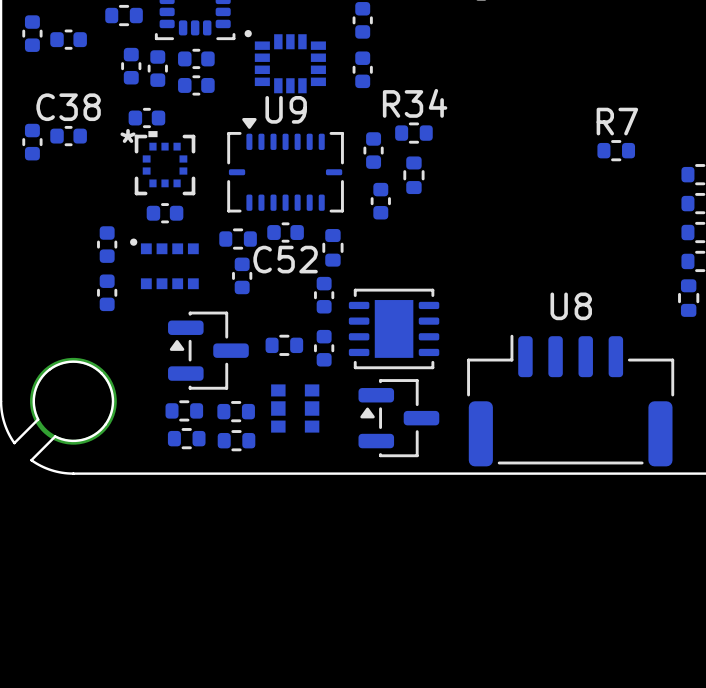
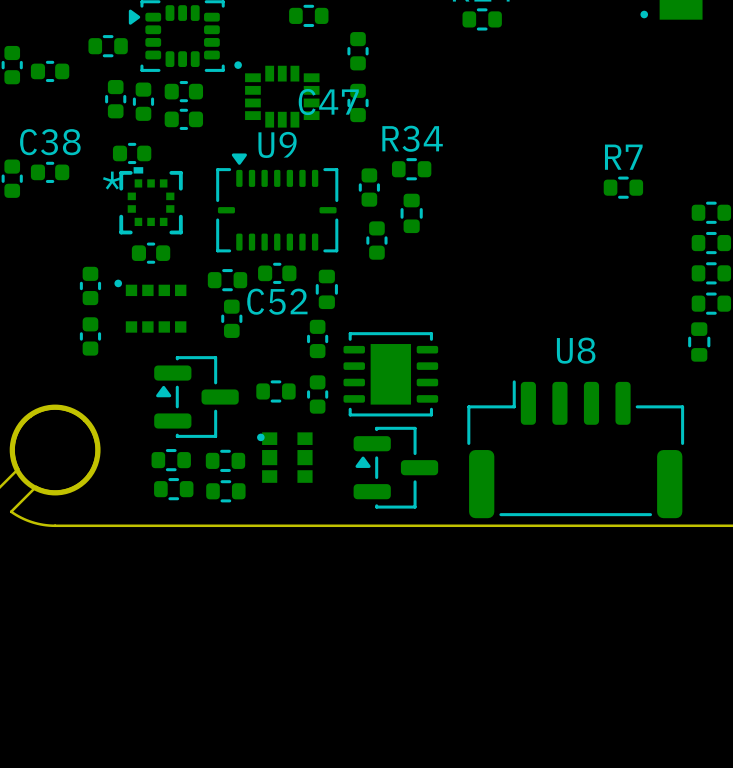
C47 name: none -> C47 (328, 102)
part footprint: [271, 384, 320, 433] -> [257, 432, 313, 483]

